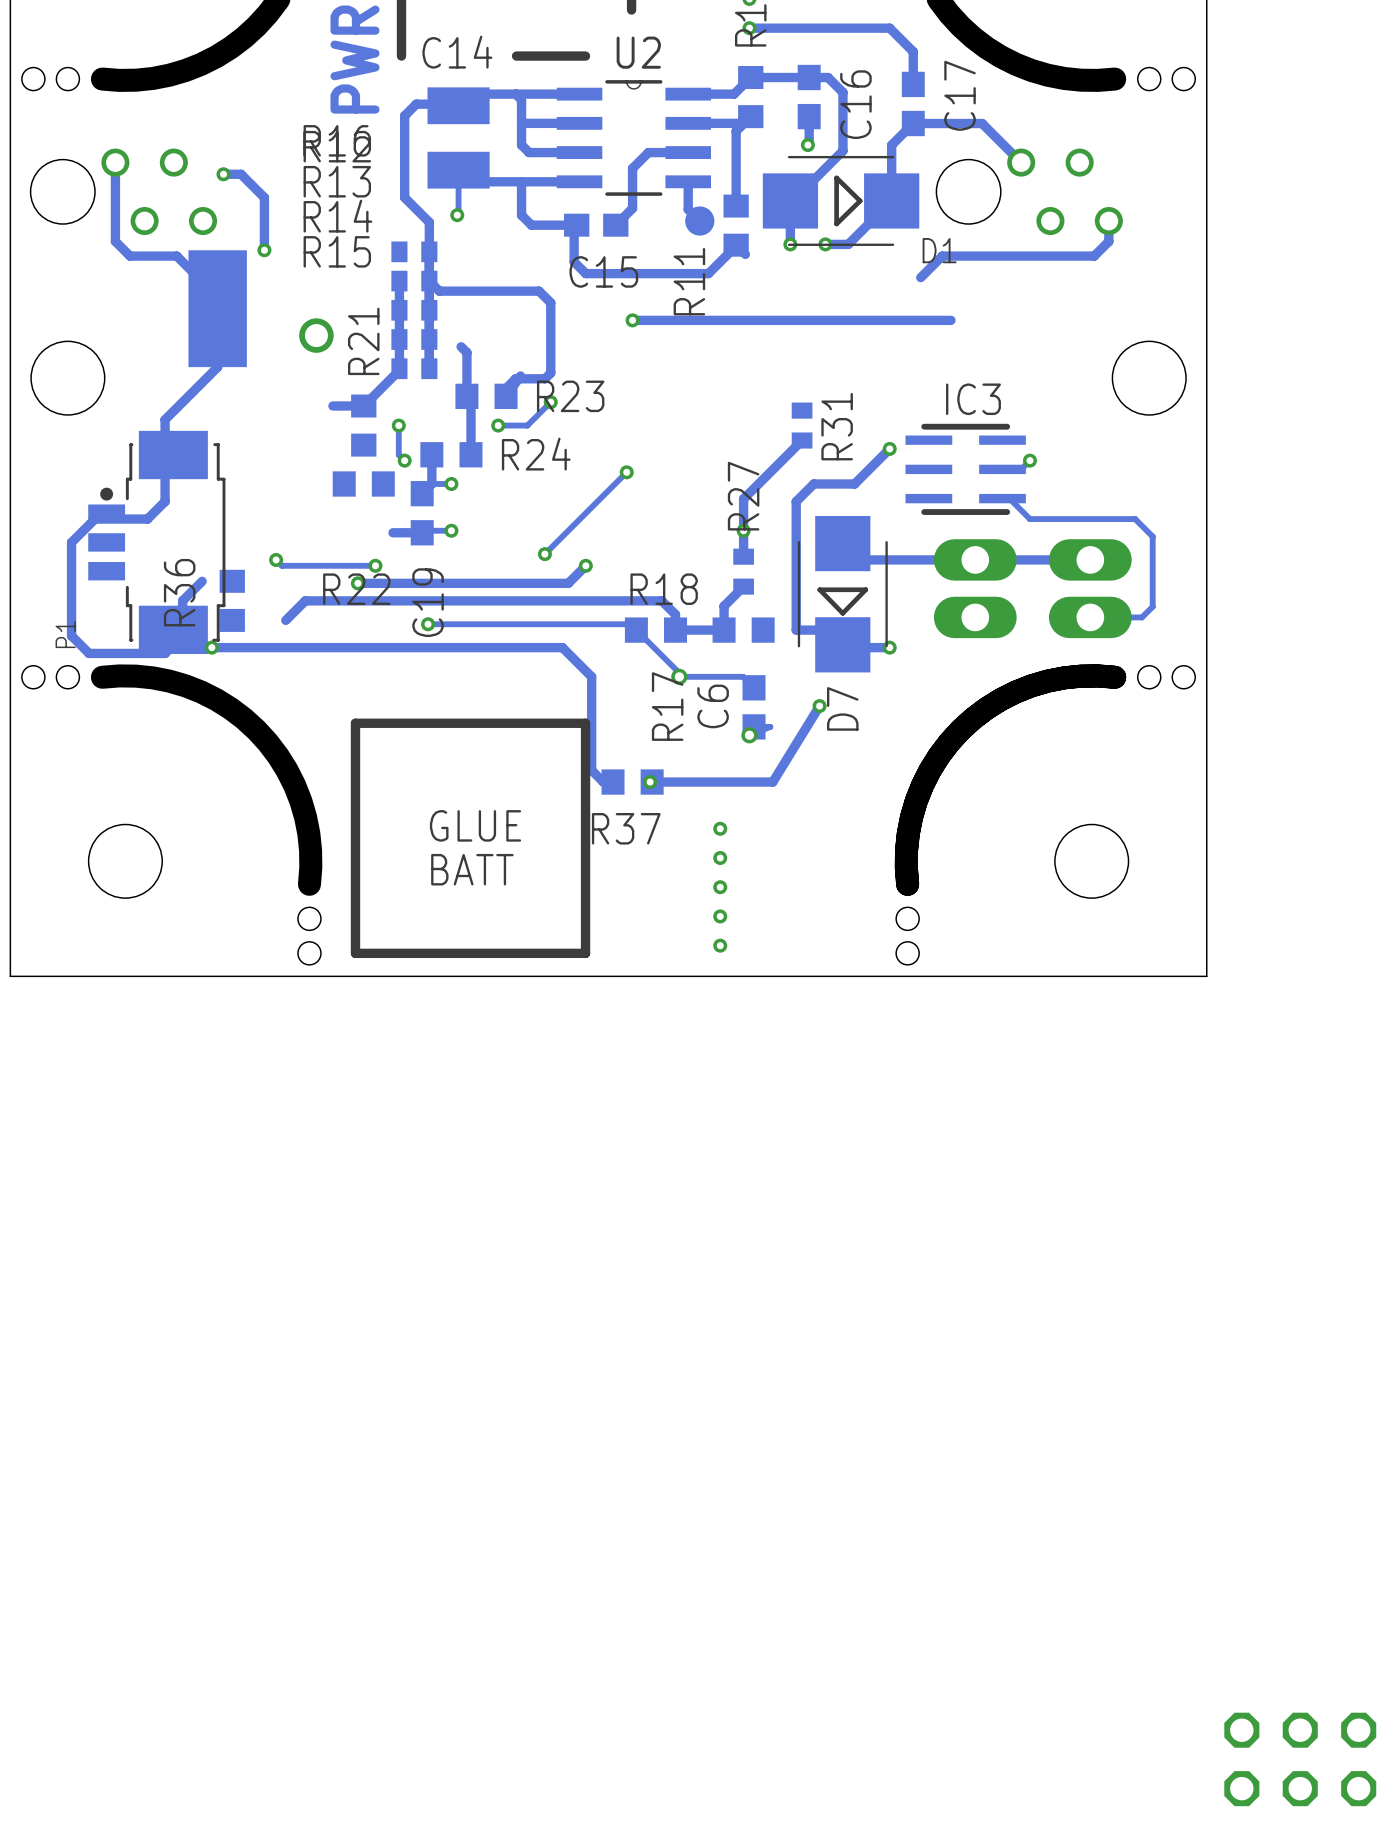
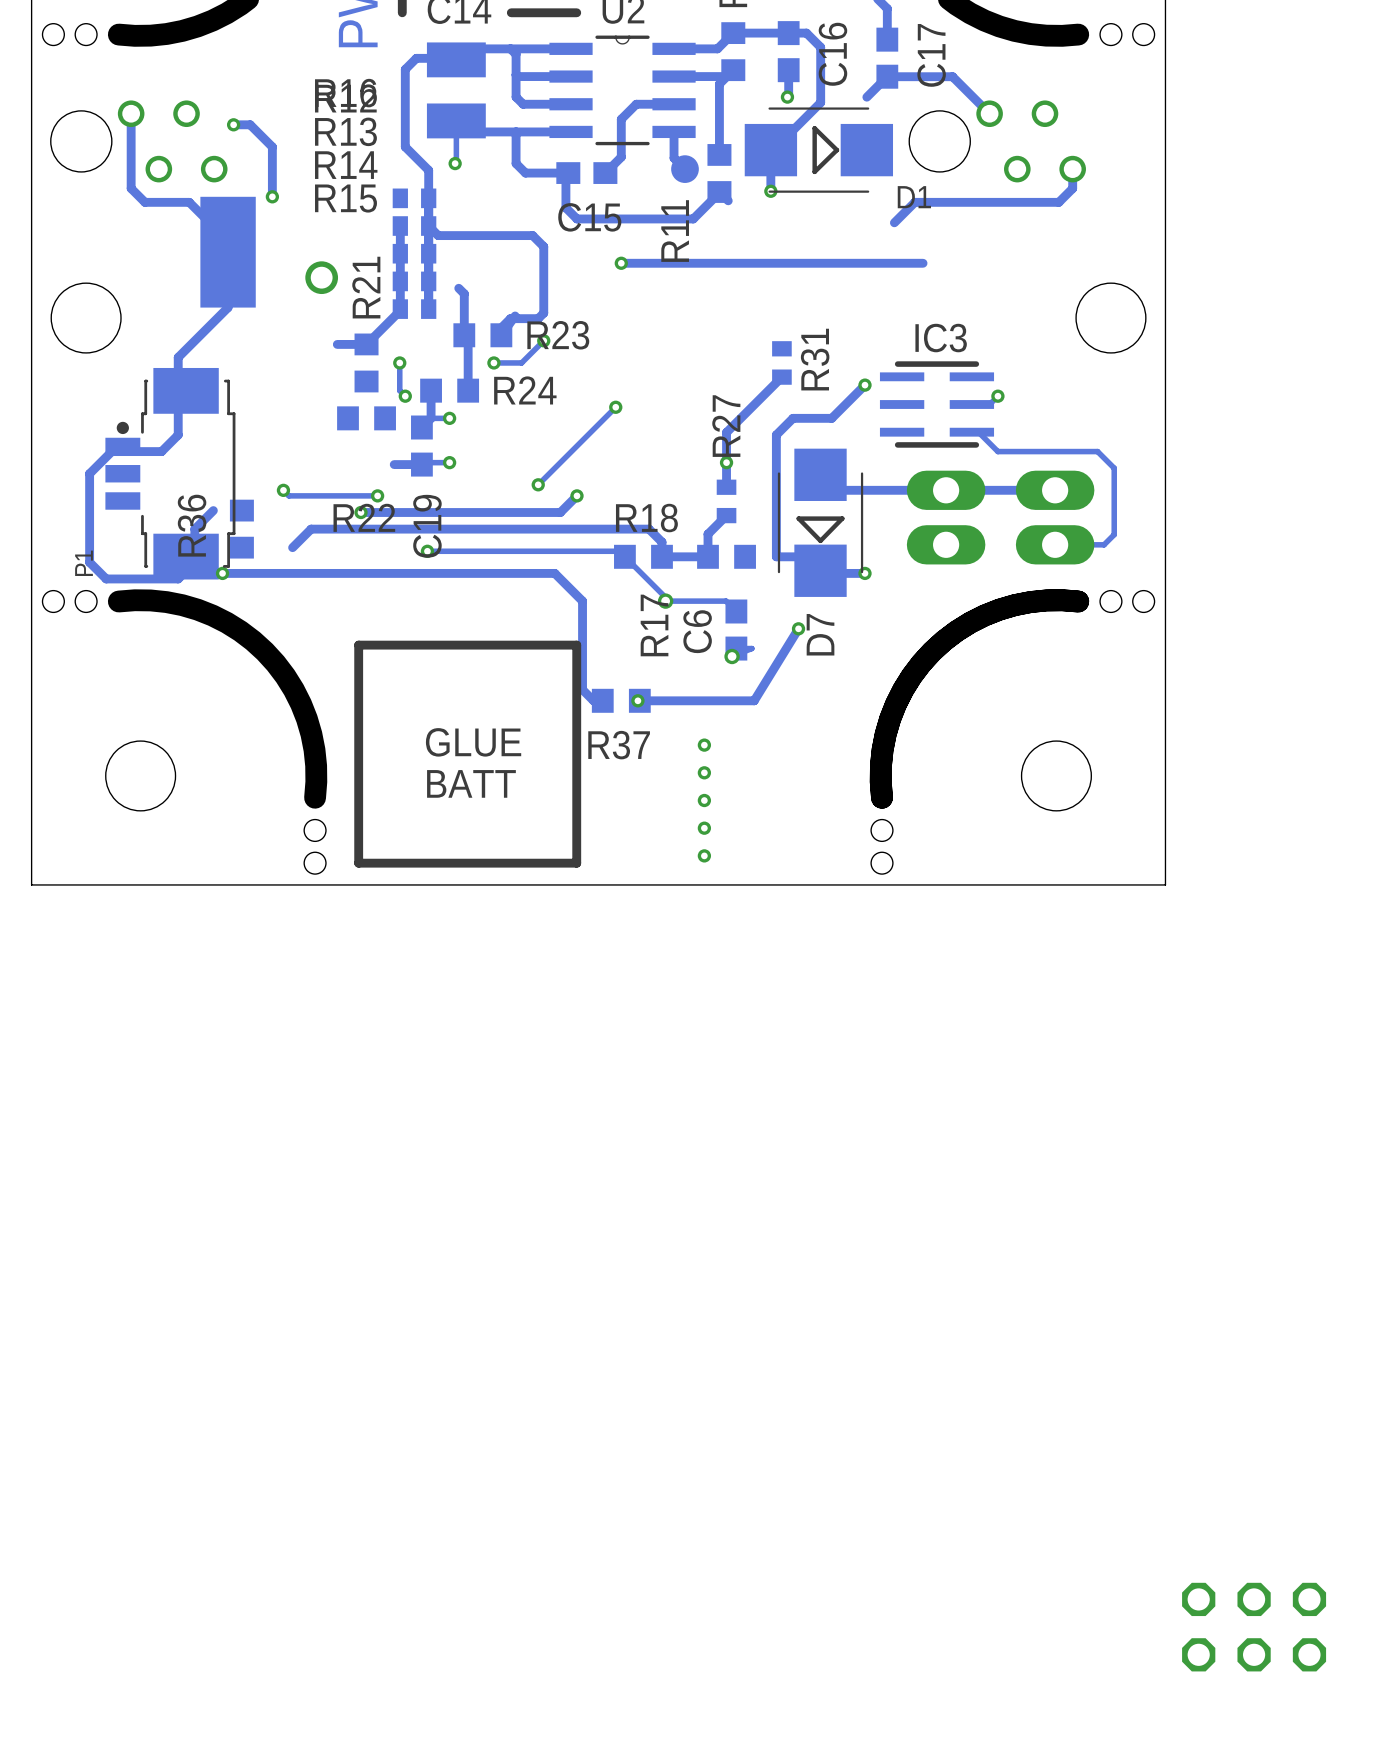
track: (891, 145) (891, 200) (848, 244) (825, 244) -> none
via: (825, 244) -> none

